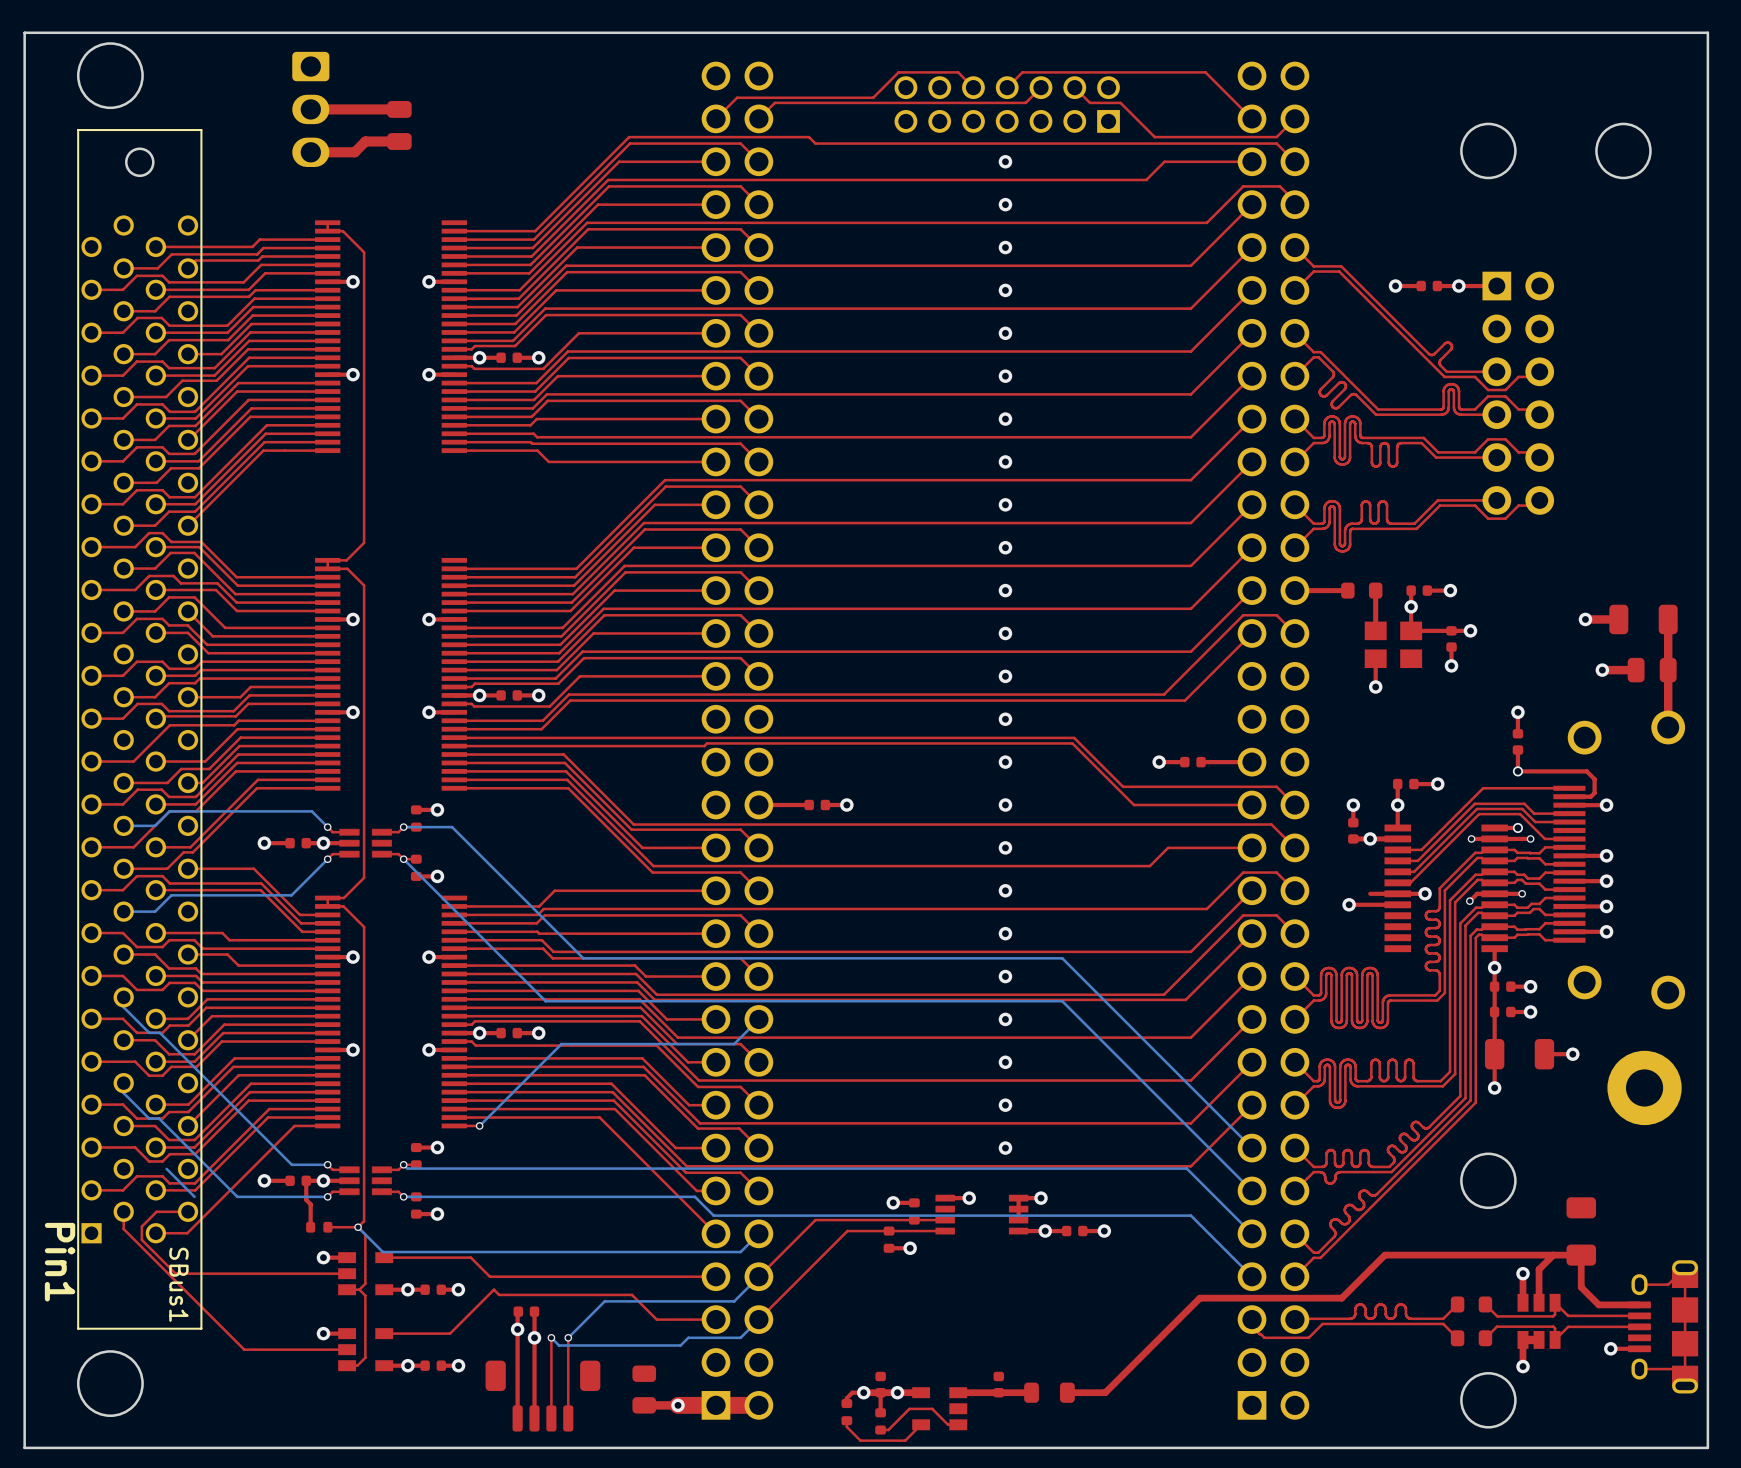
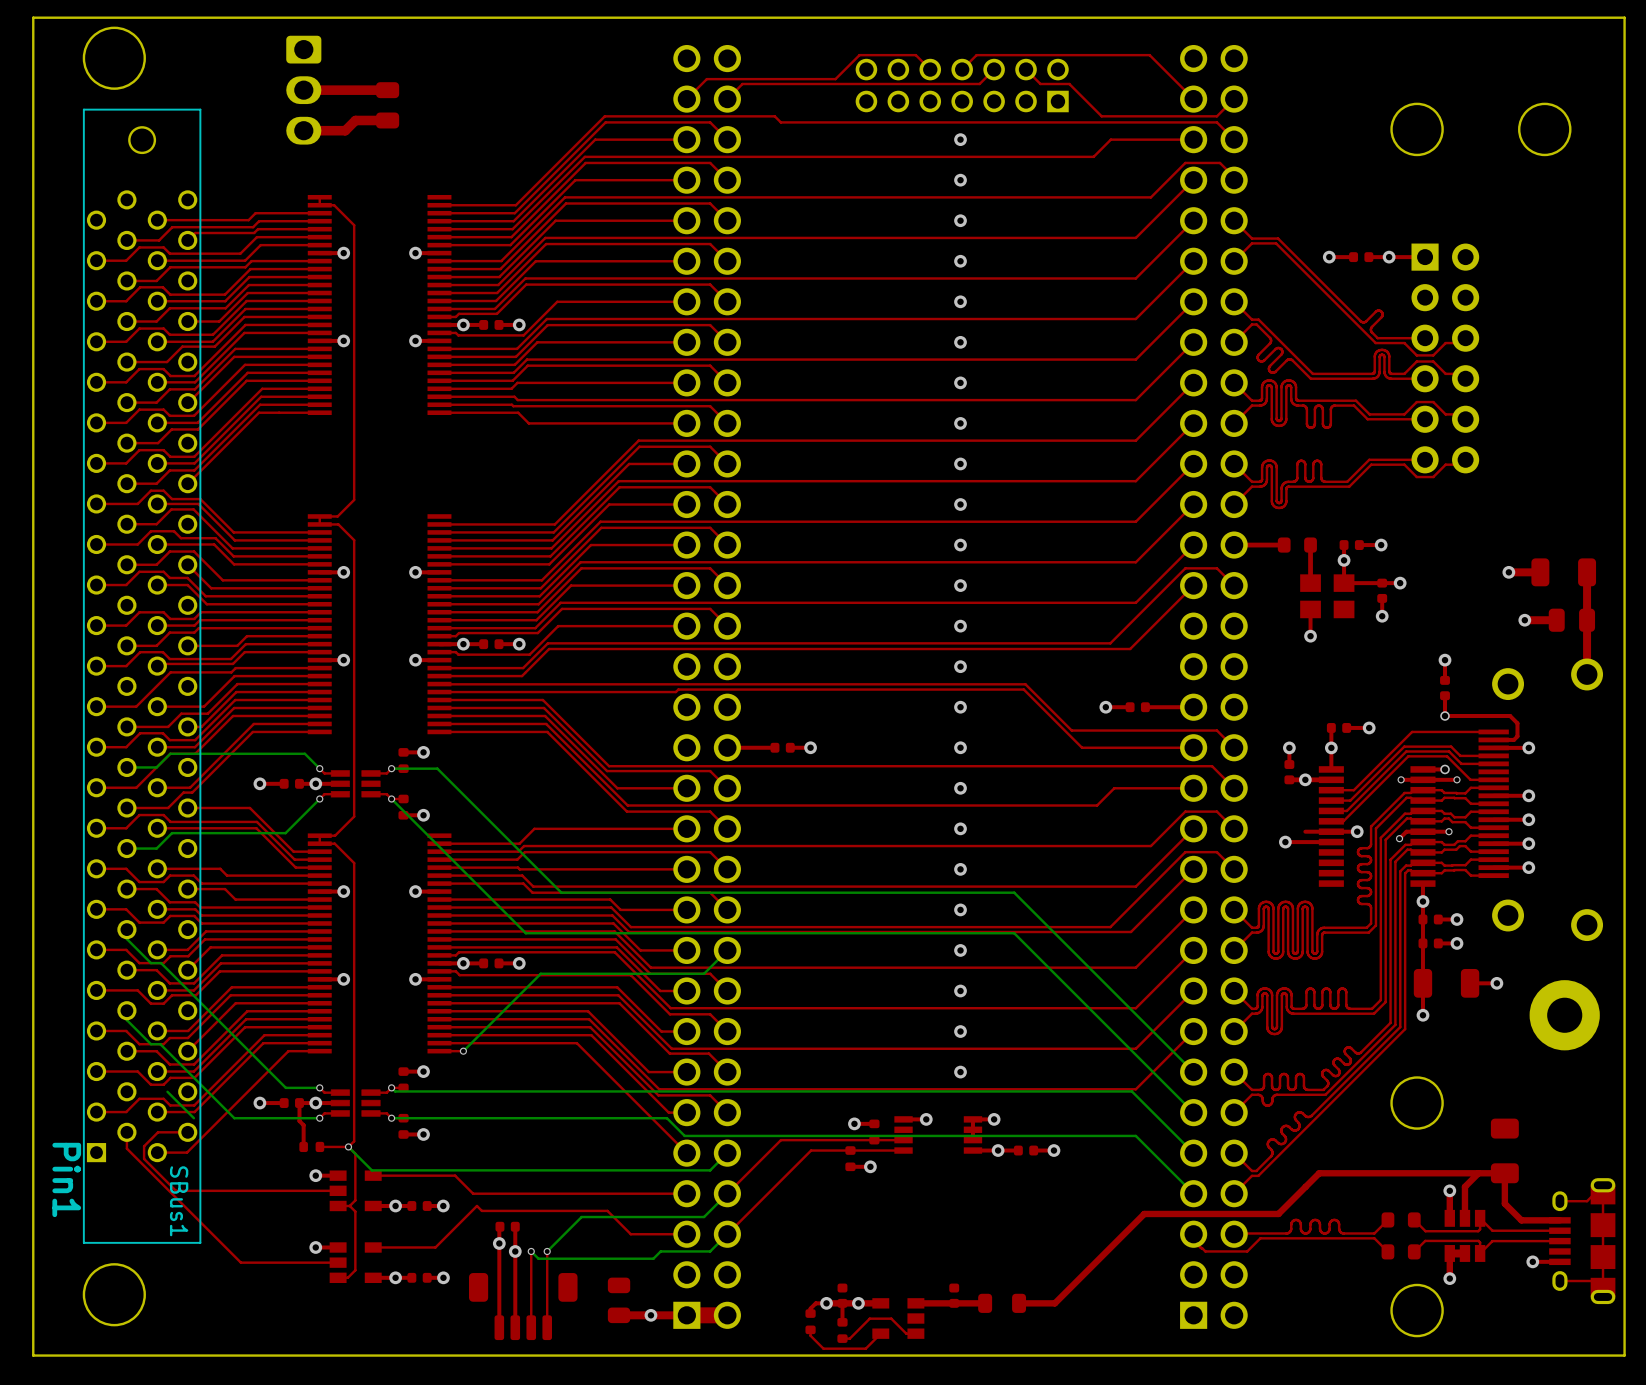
top track width: thick (716, 1405) (678, 1405) -> thin (686, 1315) (650, 1315)

